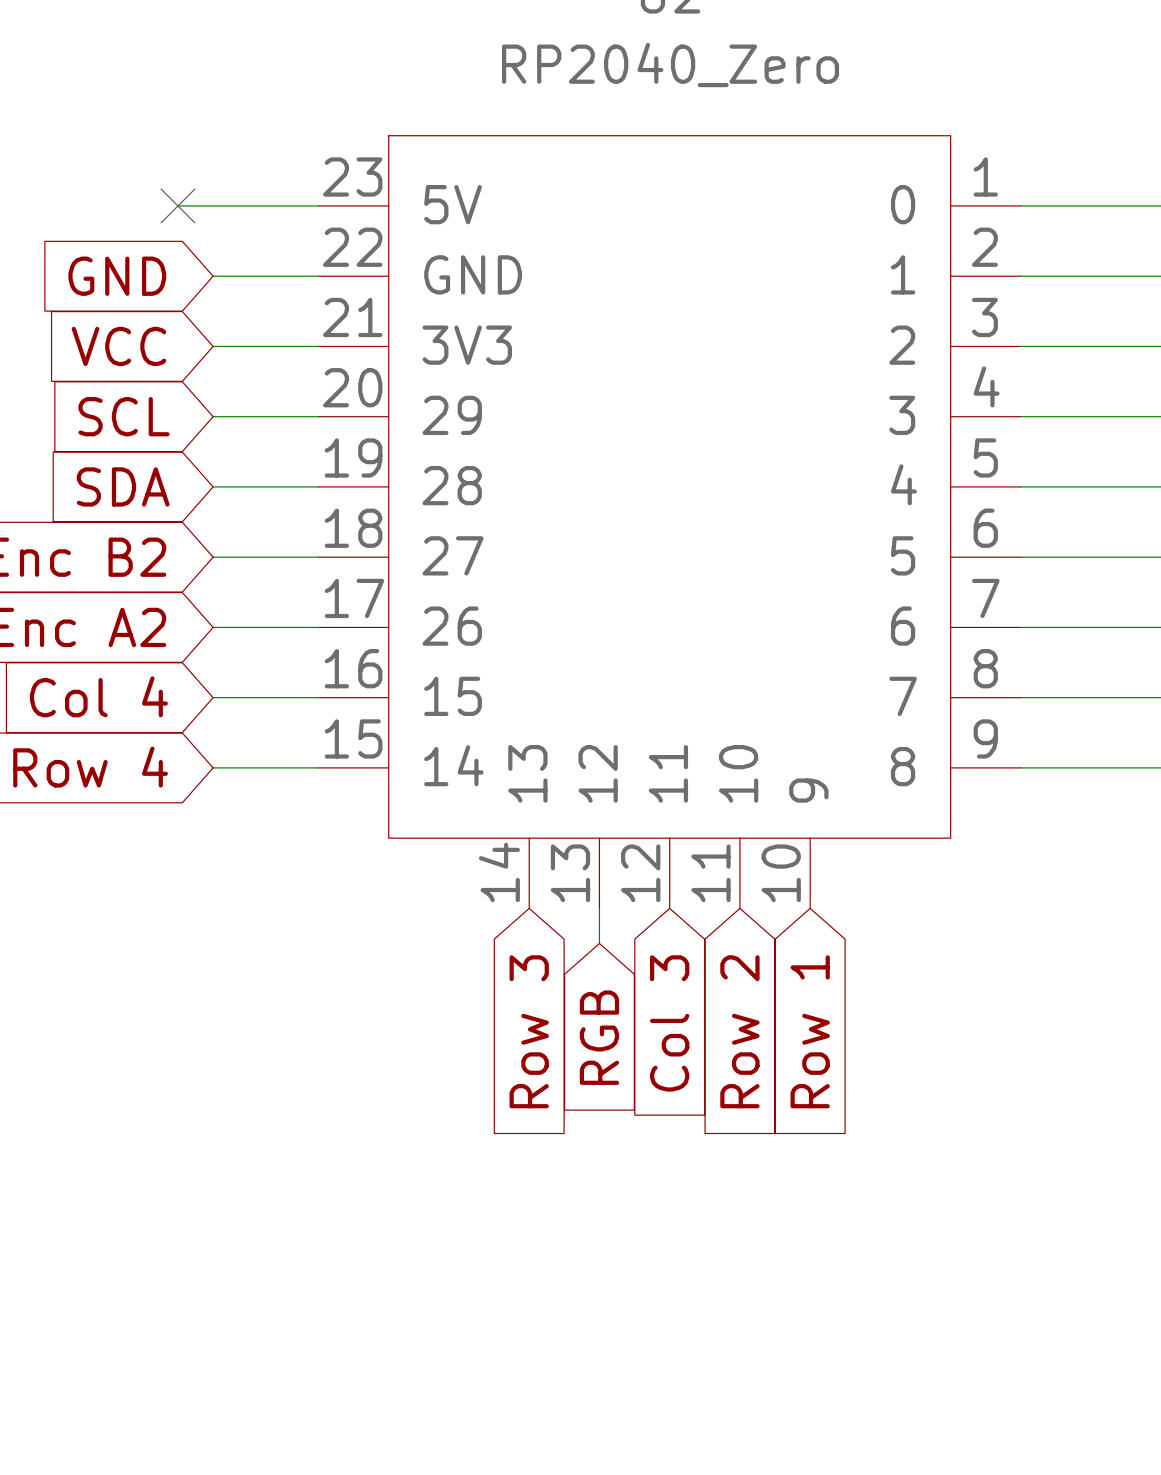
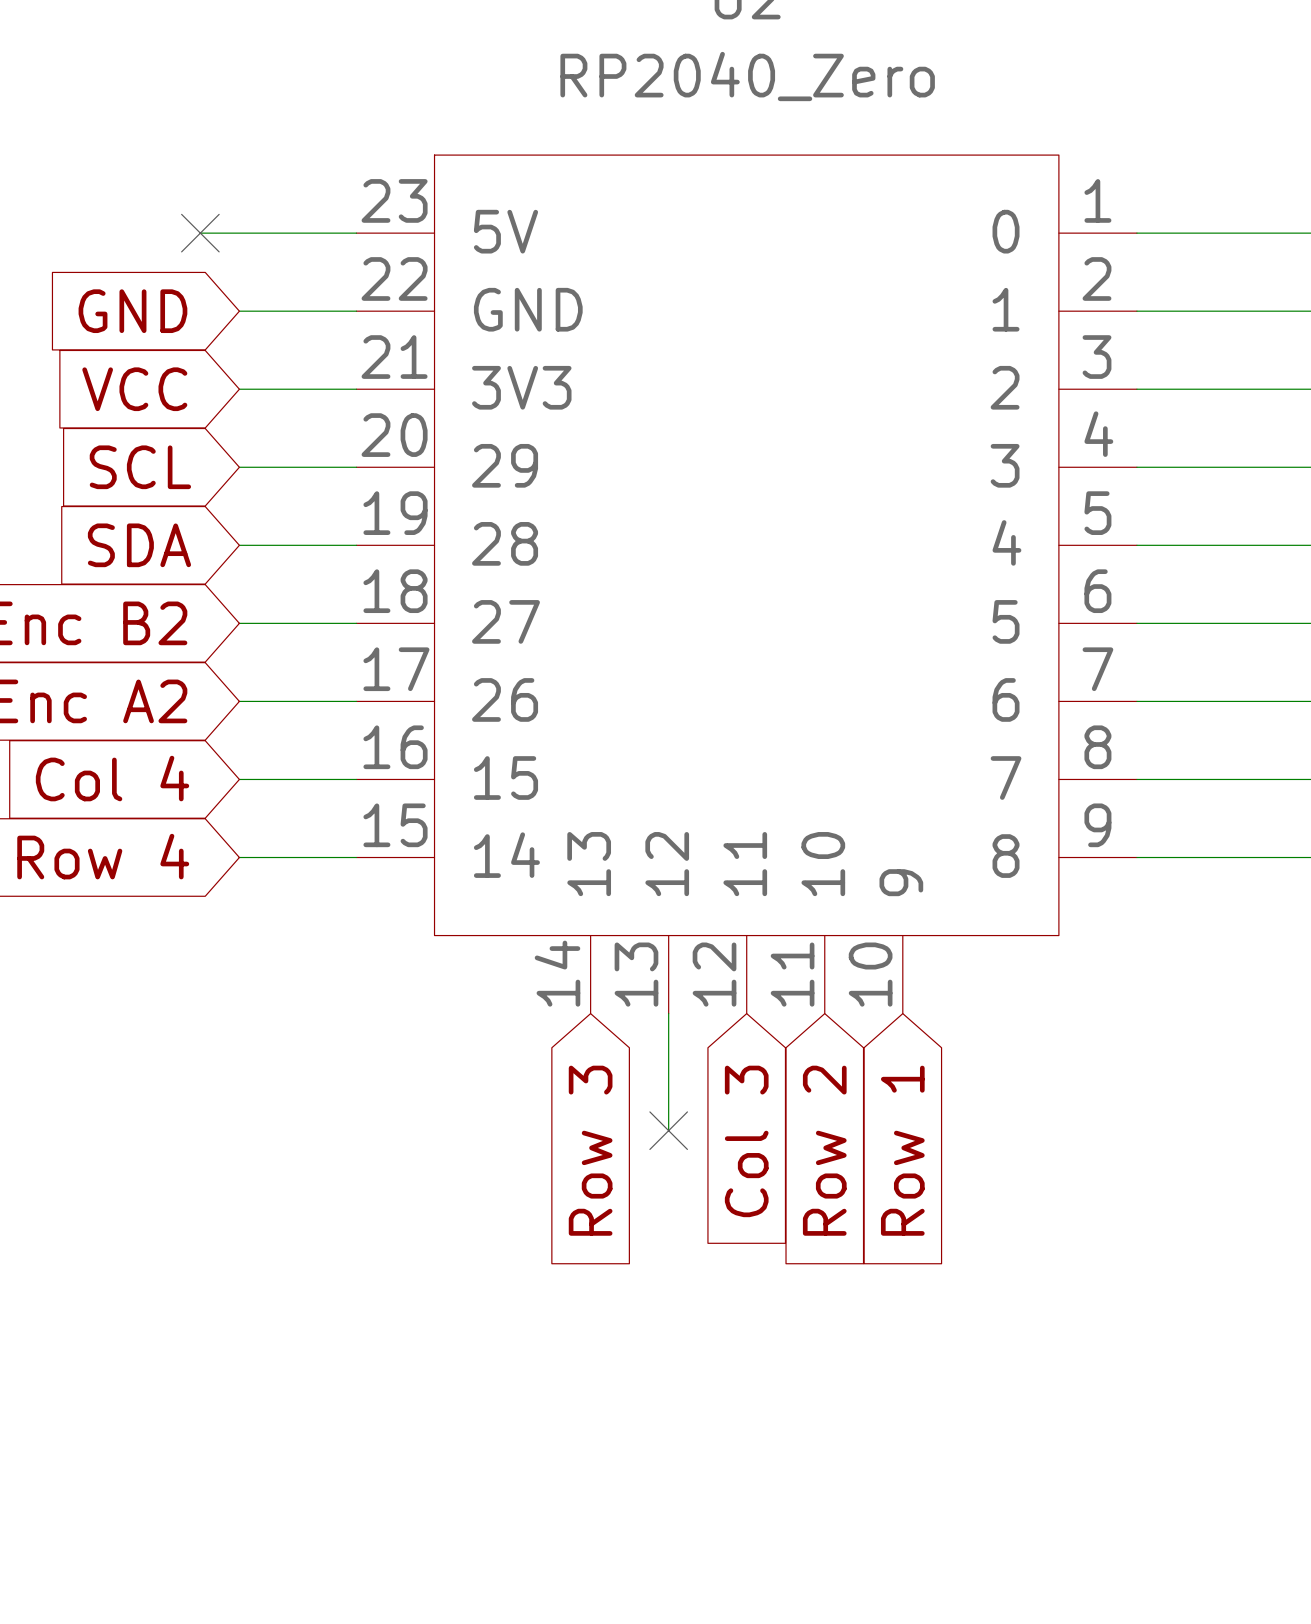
wire: none -> (668, 1052) (668, 1130)
no-connect mark: none -> (668, 1130)
global label: RGB (599, 1037) -> none

